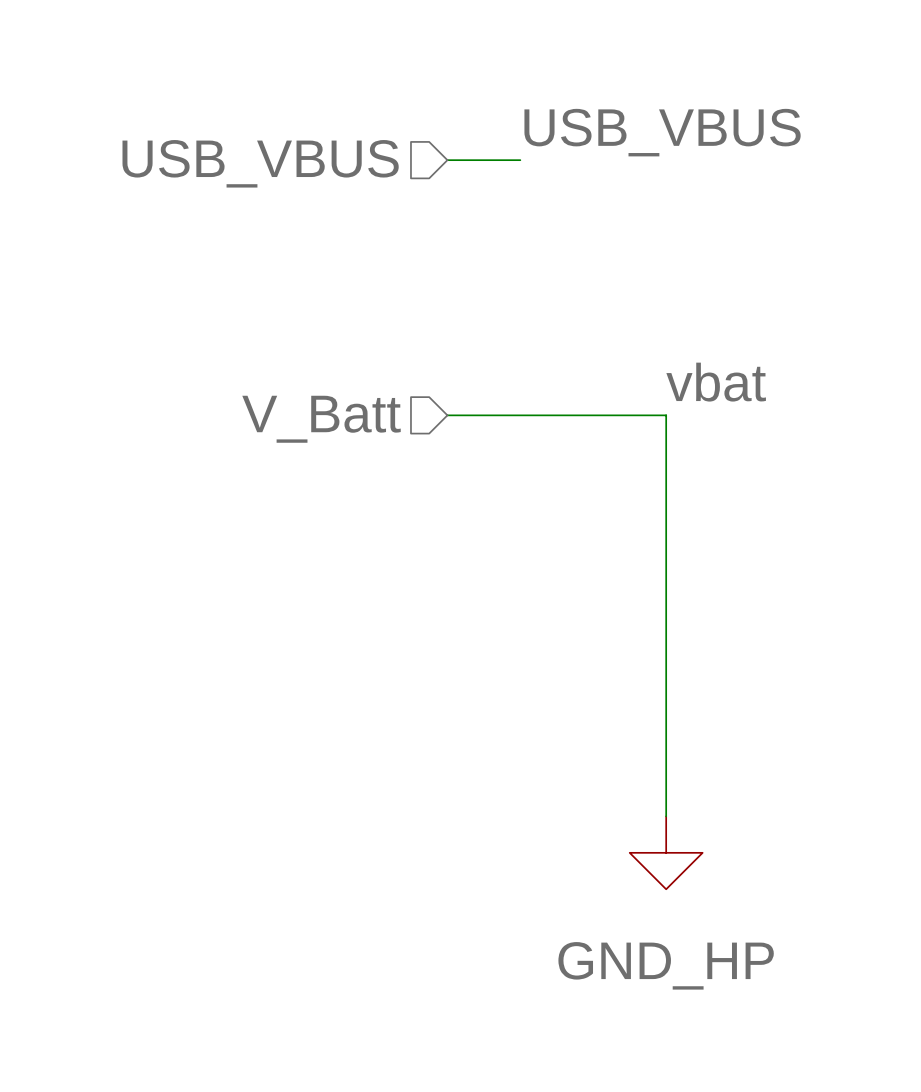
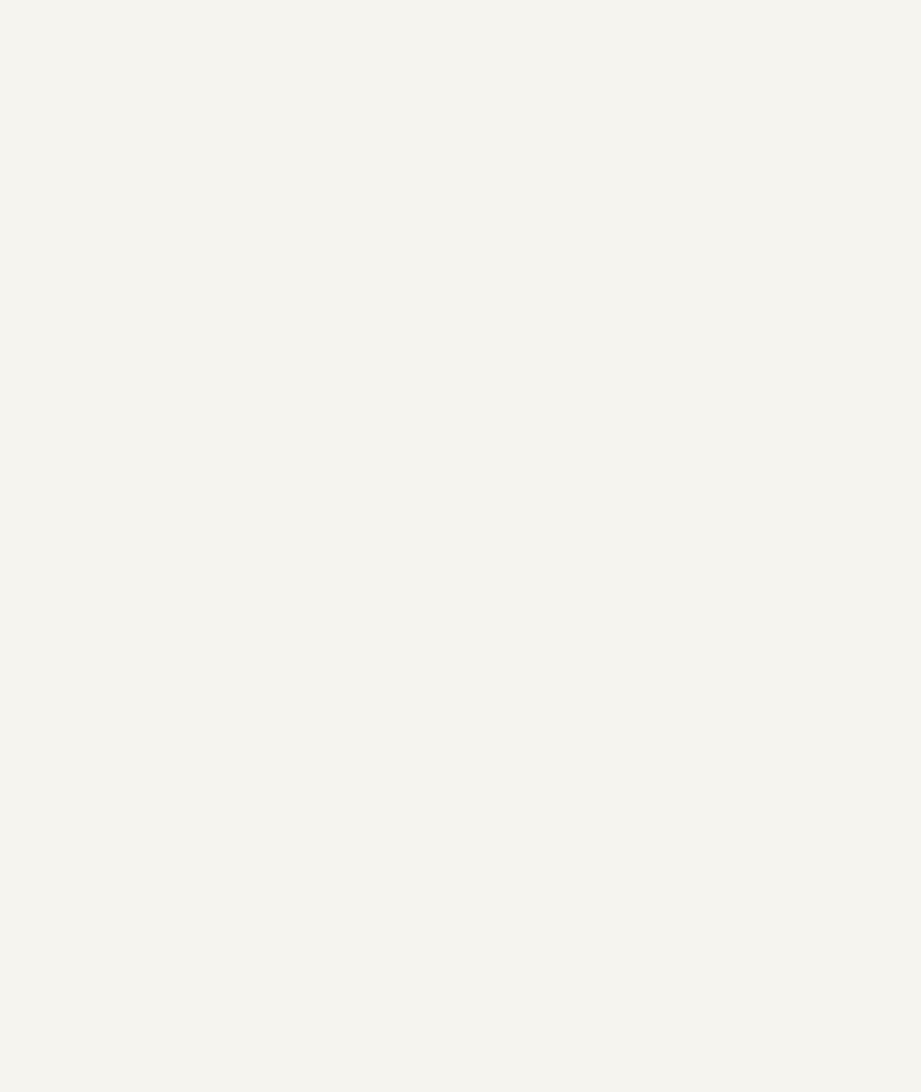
label: USB_VBUS (662, 132) -> none
wire: (447, 160) (520, 160) -> none
hierarchical label: USB_VBUS (260, 163) -> none
label: vbat (716, 382) -> none
wire: (447, 415) (666, 415) (666, 816) -> none
hierarchical label: V_Batt (321, 419) -> none
power symbol: GND_HP (666, 852) -> none

